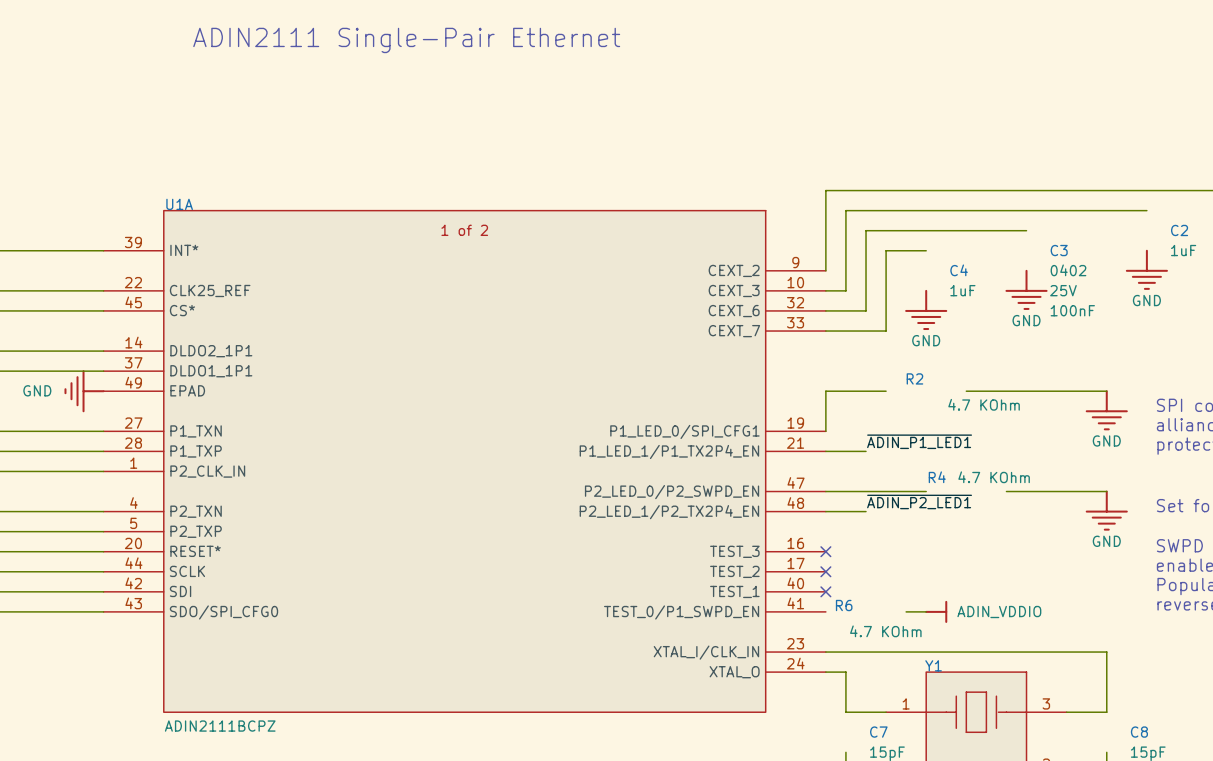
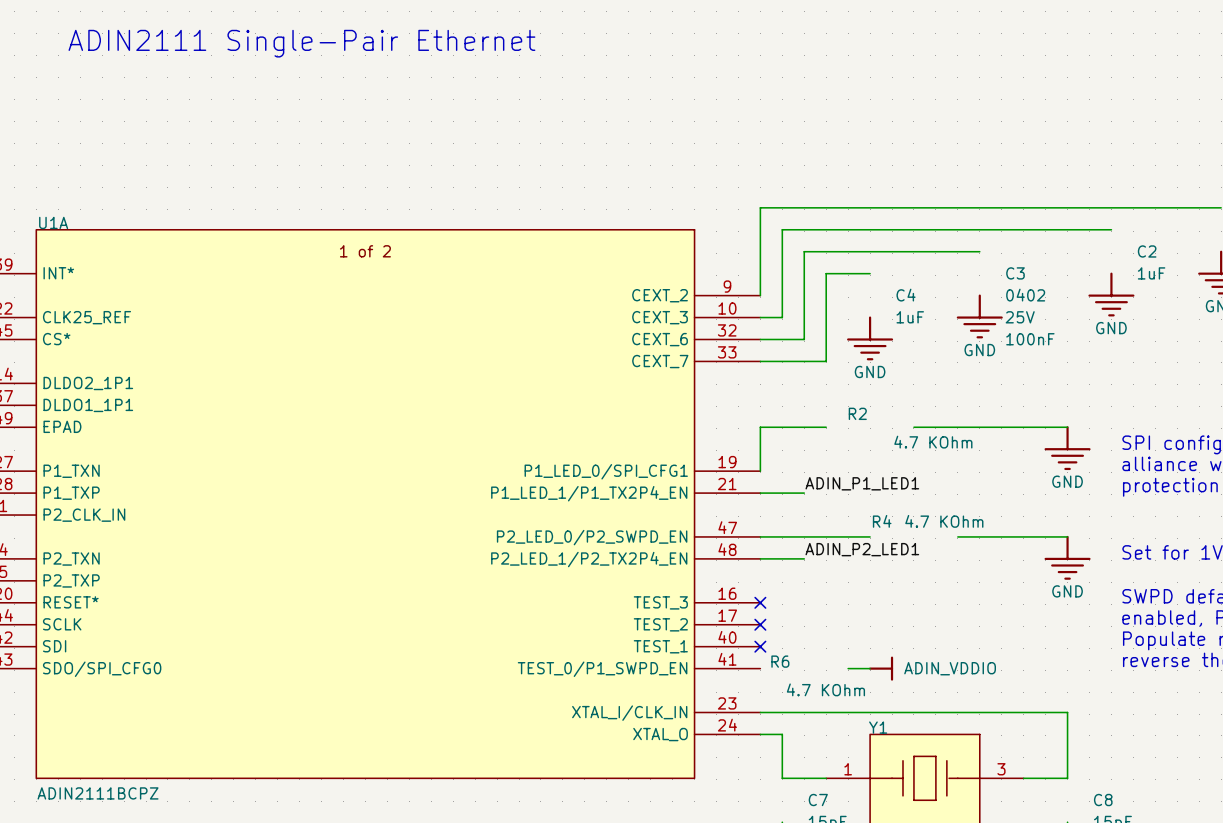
label: ~{ADIN_P1_LED1} (919, 441) -> ADIN_P1_LED1 (862, 483)
label: ~{ADIN_P2_LED1} (919, 501) -> ADIN_P2_LED1 (862, 549)

